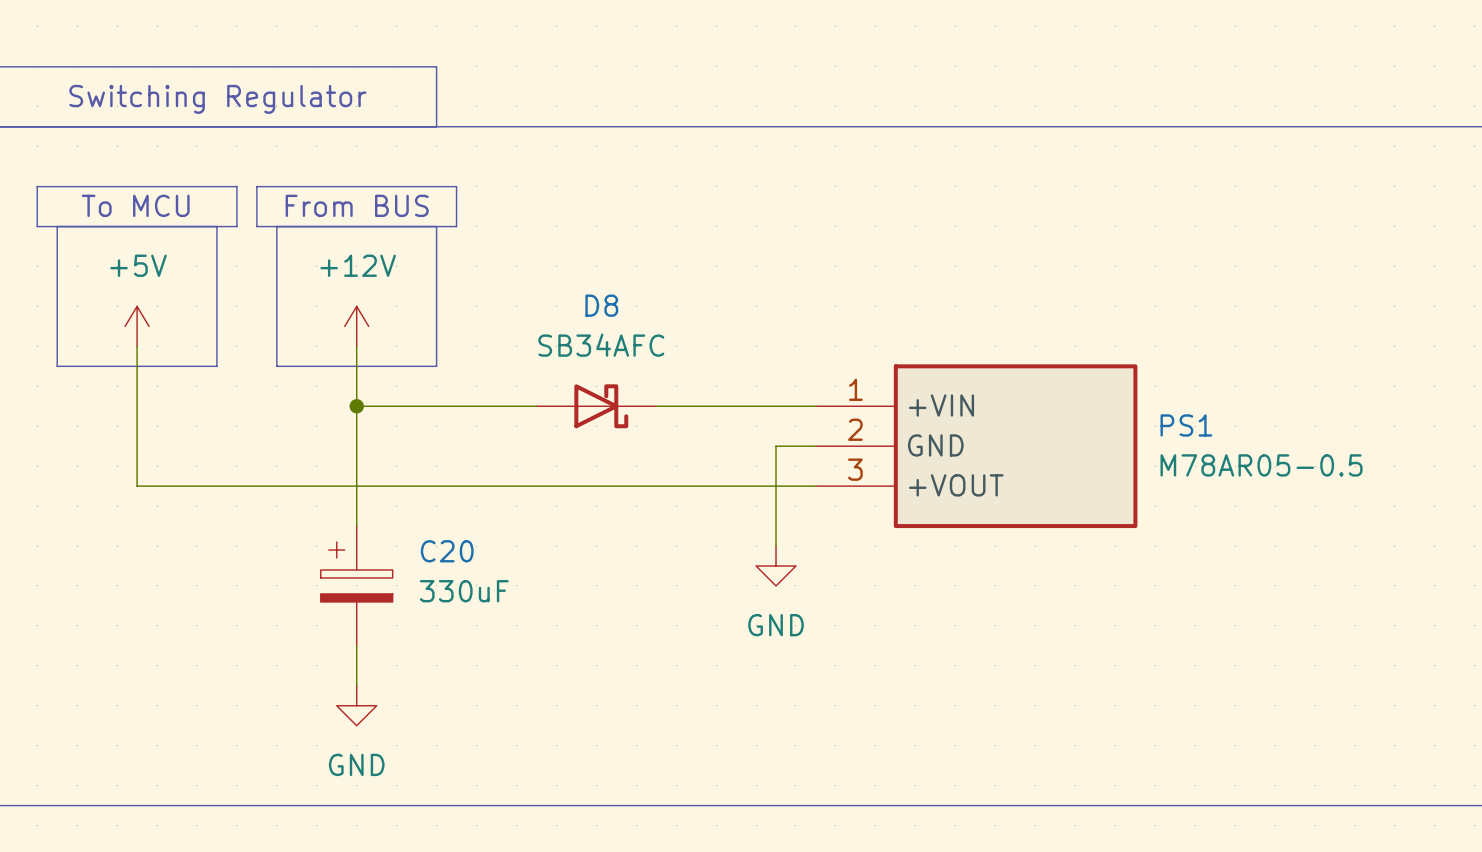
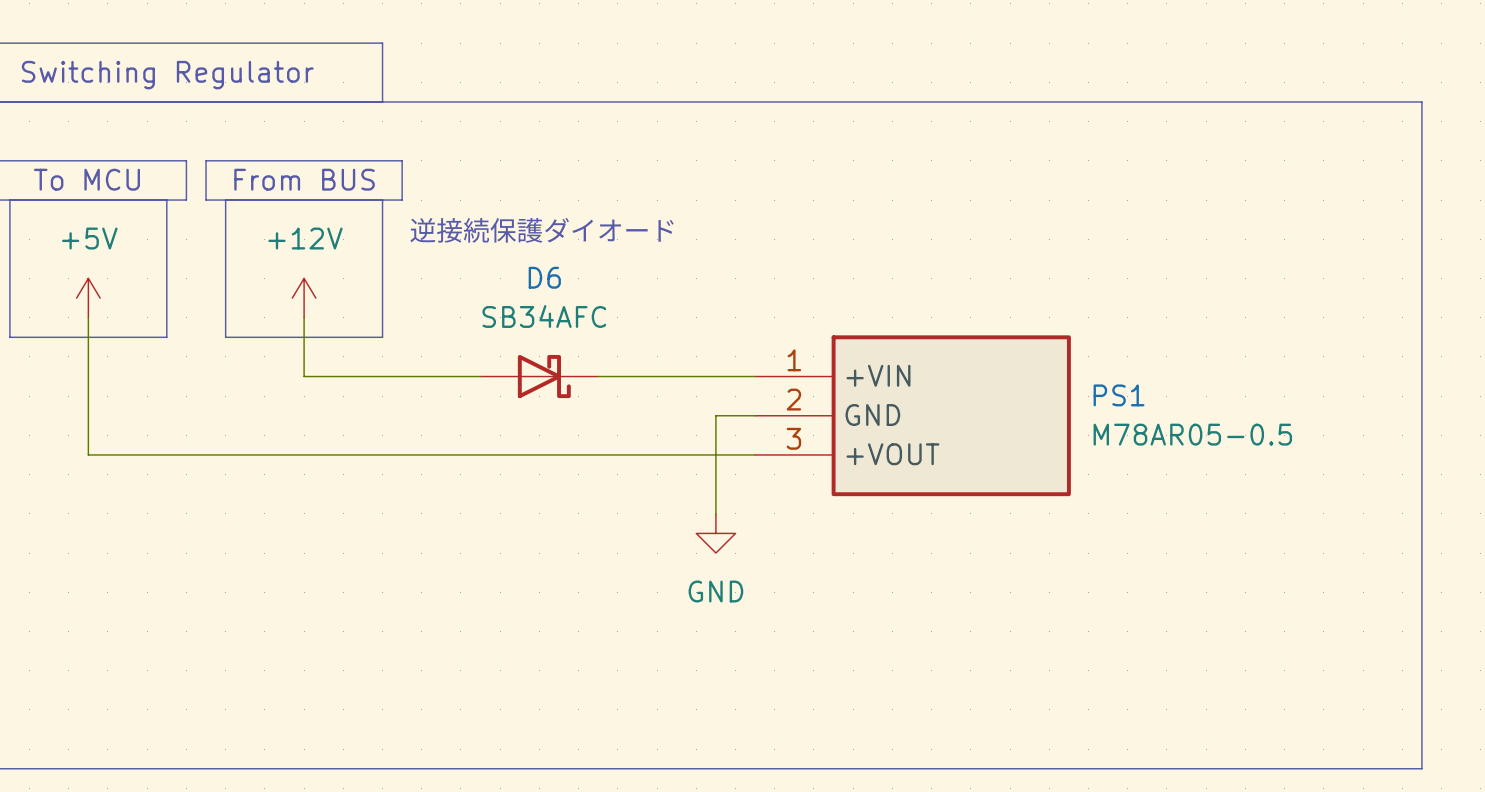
text: none -> 逆接続保護ダイオード (542, 230)
D8 name: D8 (601, 305) -> D6 (544, 277)
wire: (356, 406) (356, 526) -> none
junction: (356, 406) -> none
C20: 330uF (356, 585) -> none
wire: (356, 645) (356, 685) -> none
power symbol: GND (356, 705) -> none

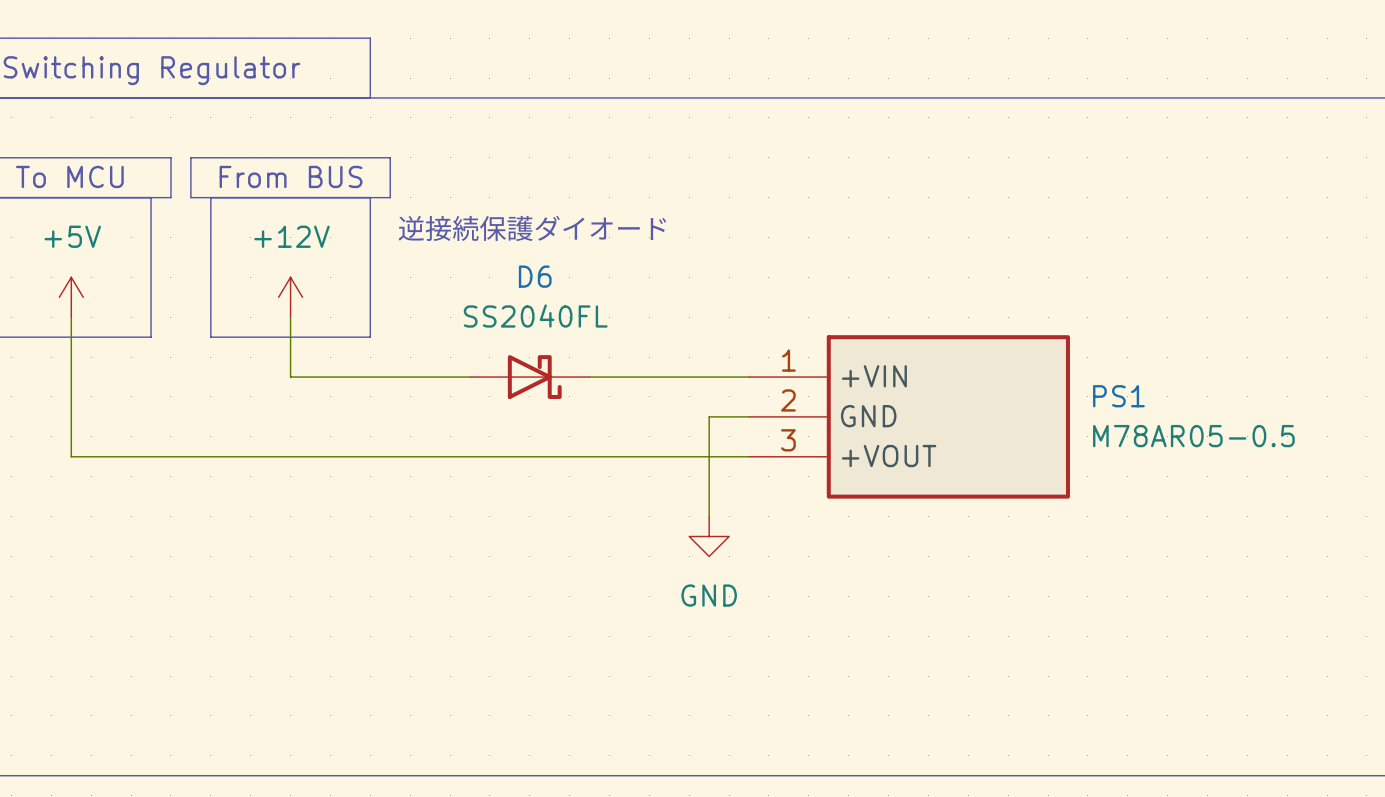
D6 value: SB34AFC (544, 316) -> SS2040FL (535, 316)

